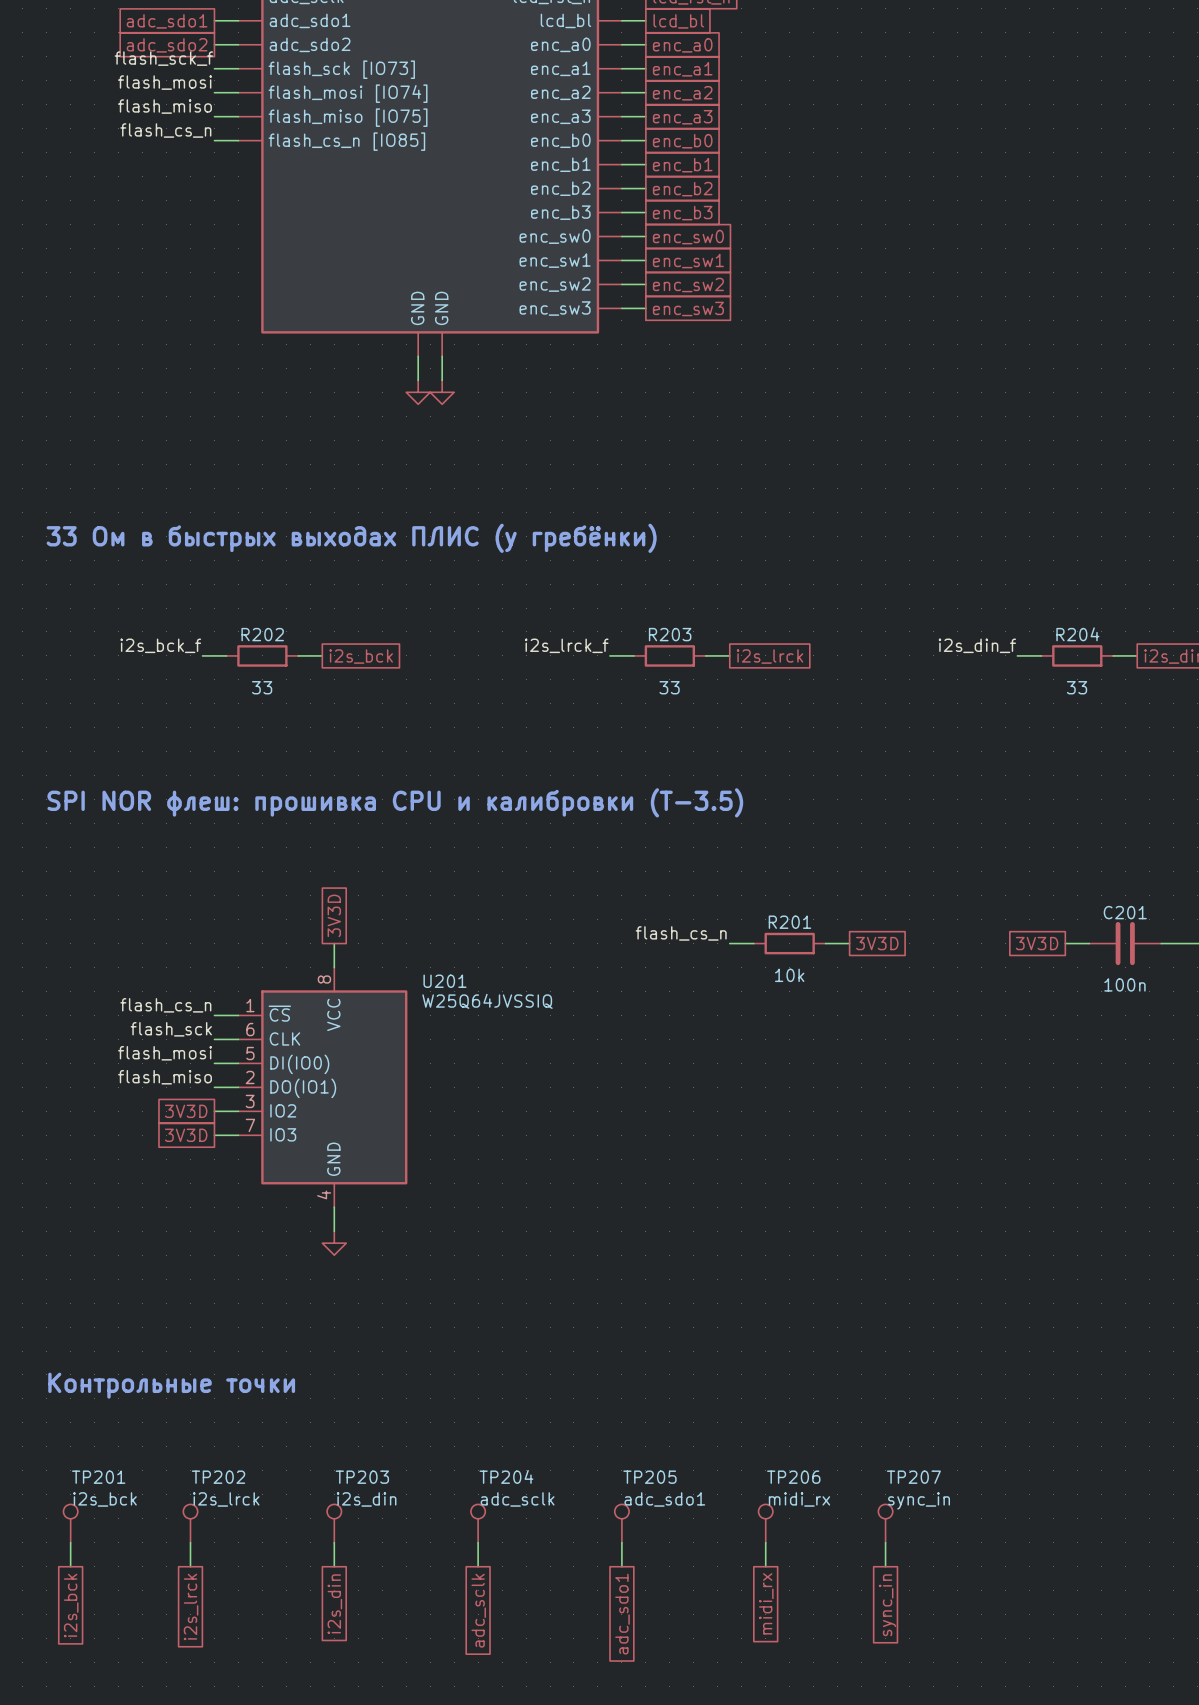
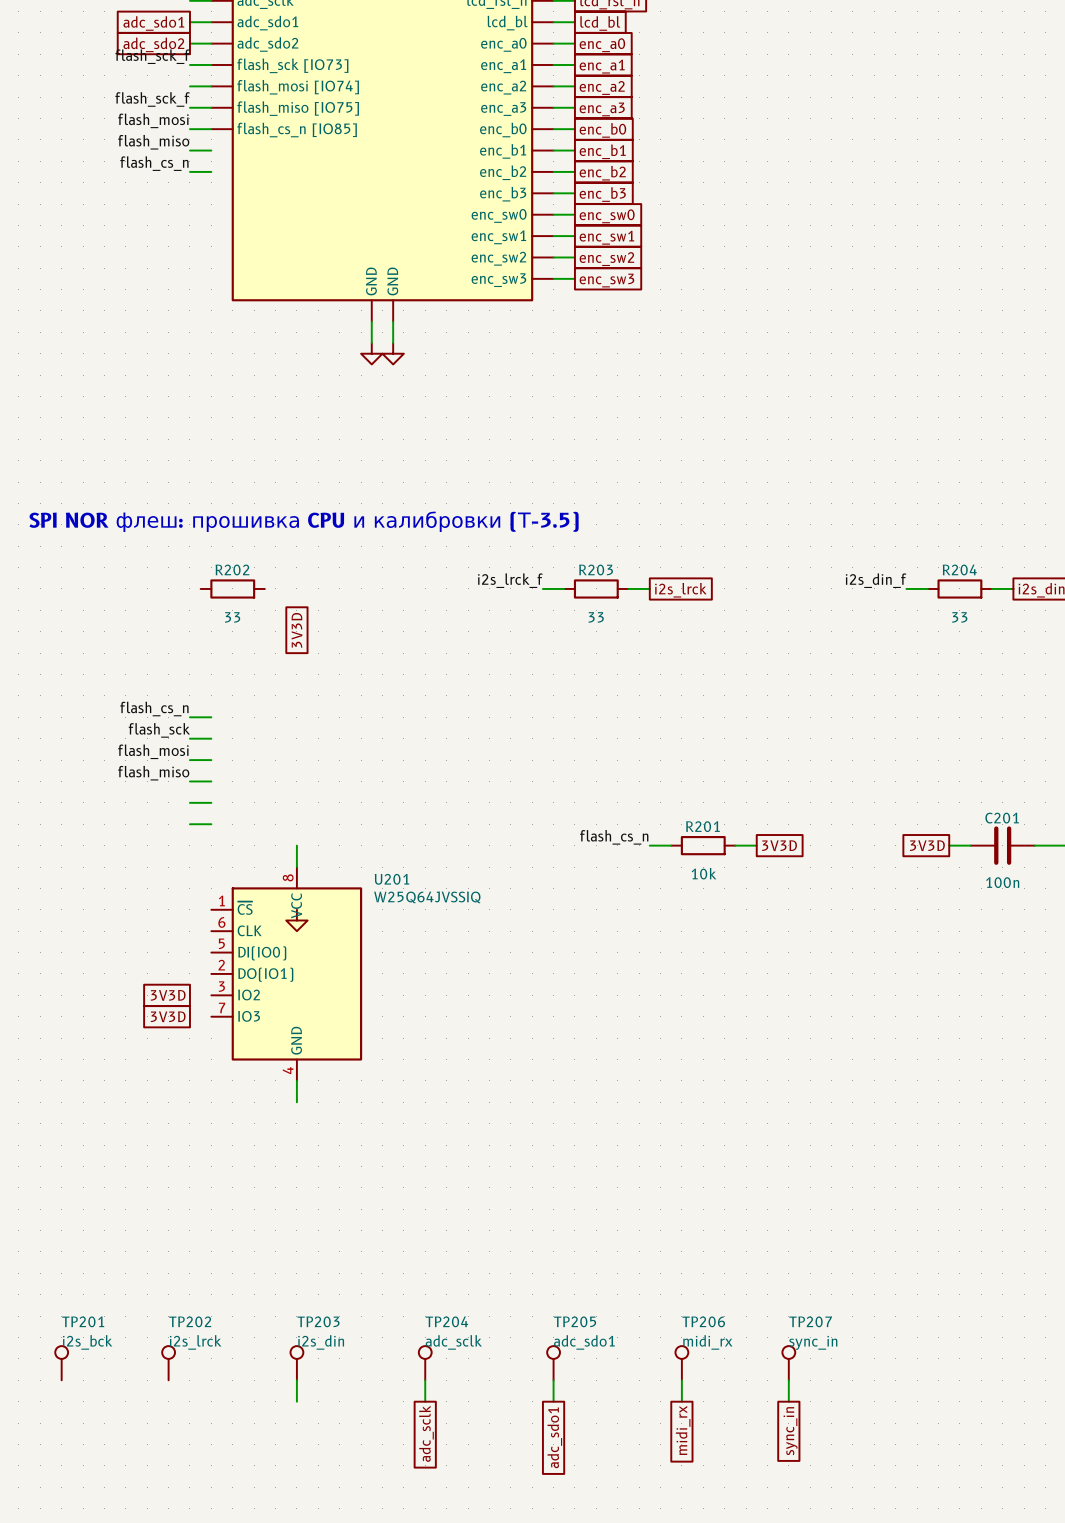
label: flash_mosi (165, 82) -> none
label: flash_miso (165, 106) -> flash_sck_f (152, 99)
label: flash_cs_n (165, 130) -> flash_mosi (153, 120)
label: none -> flash_miso (153, 142)
wire: none -> (189, 150) (211, 150)
label: none -> flash_cs_n (154, 163)
wire: none -> (189, 171) (211, 171)
text: 33 Ом в быстрых выходах ПЛИС (у гребёнки) (351, 538) -> none
label: i2s_bck_f (160, 645) -> none
wire: (202, 655) (226, 655) -> none
wire: (298, 655) (322, 655) -> none
global label: i2s_bck (361, 656) -> none
text position: SPI NOR флеш: прошивка CPU и калибровки (Т-3.5) (395, 802) -> SPI NOR флеш: прошивка CPU и калибровки (Т-3.5) (304, 521)
global label position: 3V3D (334, 915) -> 3V3D (296, 630)
label position: flash_cs_n (165, 1005) -> flash_cs_n (154, 709)
wire: (214, 1015) (238, 1015) -> (189, 717) (211, 717)
label position: flash_sck (171, 1029) -> flash_sck (159, 730)
wire: (214, 1039) (238, 1039) -> (189, 738) (211, 738)
label position: flash_mosi (165, 1053) -> flash_mosi (153, 751)
wire: (214, 1063) (238, 1063) -> (189, 760) (211, 760)
label position: flash_miso (165, 1077) -> flash_miso (153, 773)
wire: (214, 1087) (238, 1087) -> (189, 781) (211, 781)
wire: (214, 1111) (238, 1111) -> (189, 802) (211, 802)
wire: (214, 1135) (238, 1135) -> (189, 824) (211, 824)
power symbol position: (334, 1243) -> (296, 920)
text: Контрольные точки (171, 1385) -> none
wire: (70, 1542) (70, 1566) -> none
wire: (190, 1542) (190, 1566) -> none
global label: i2s_din (334, 1604) -> none
global label: i2s_bck (71, 1605) -> none
global label: i2s_lrck (191, 1606) -> none

